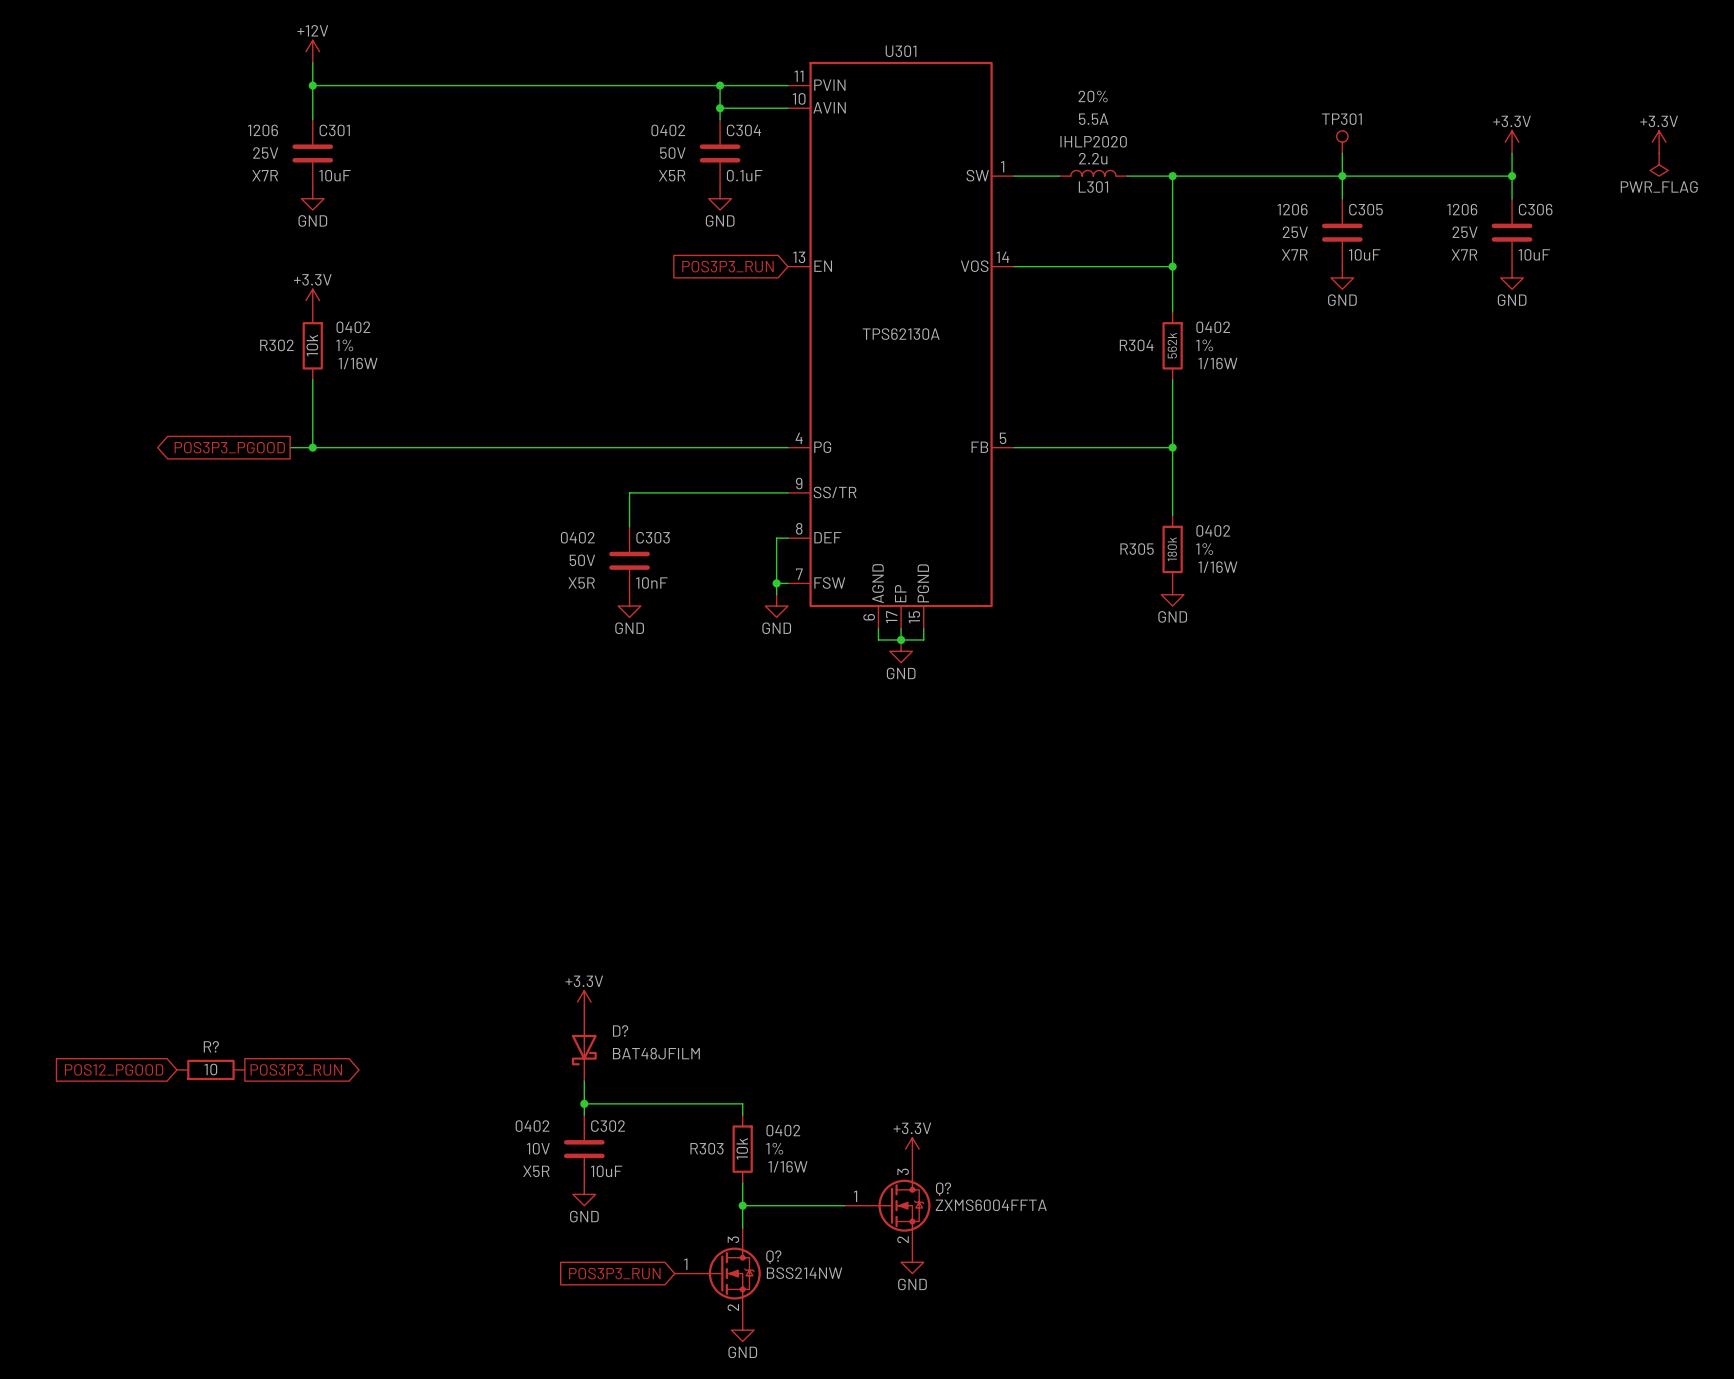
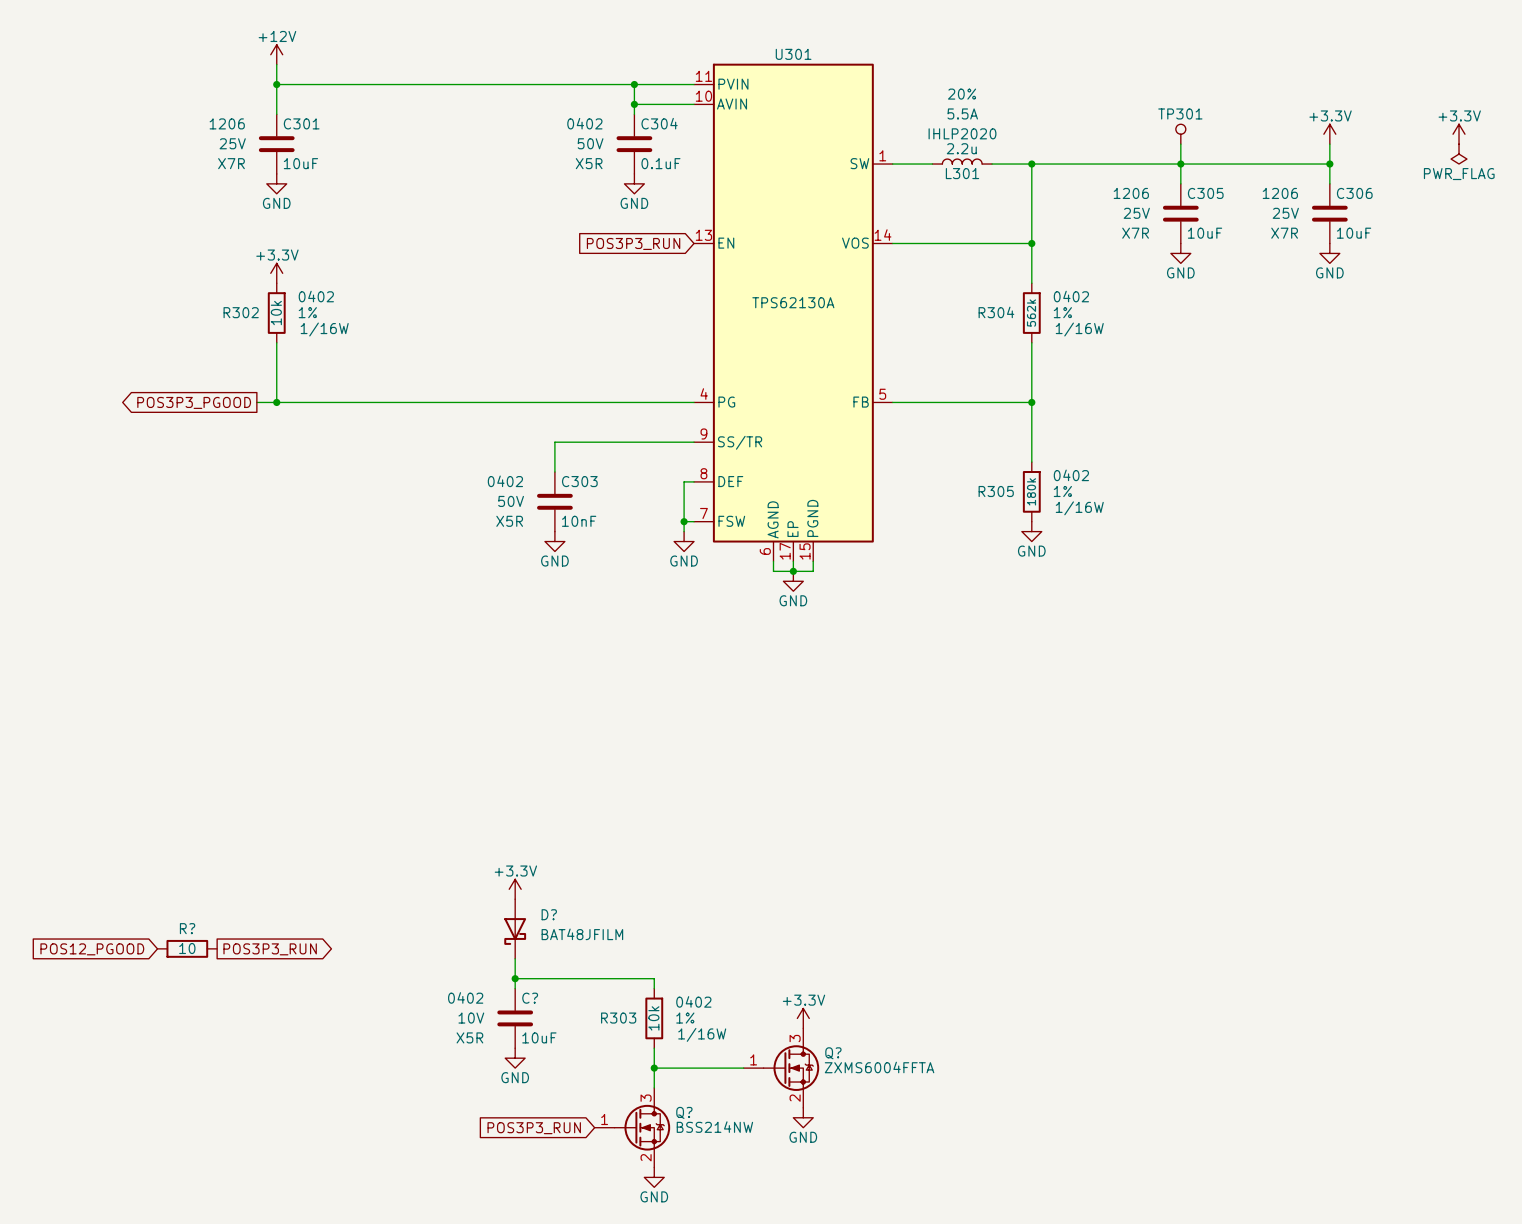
C302 name: C302 (608, 1126) -> C? (530, 998)

